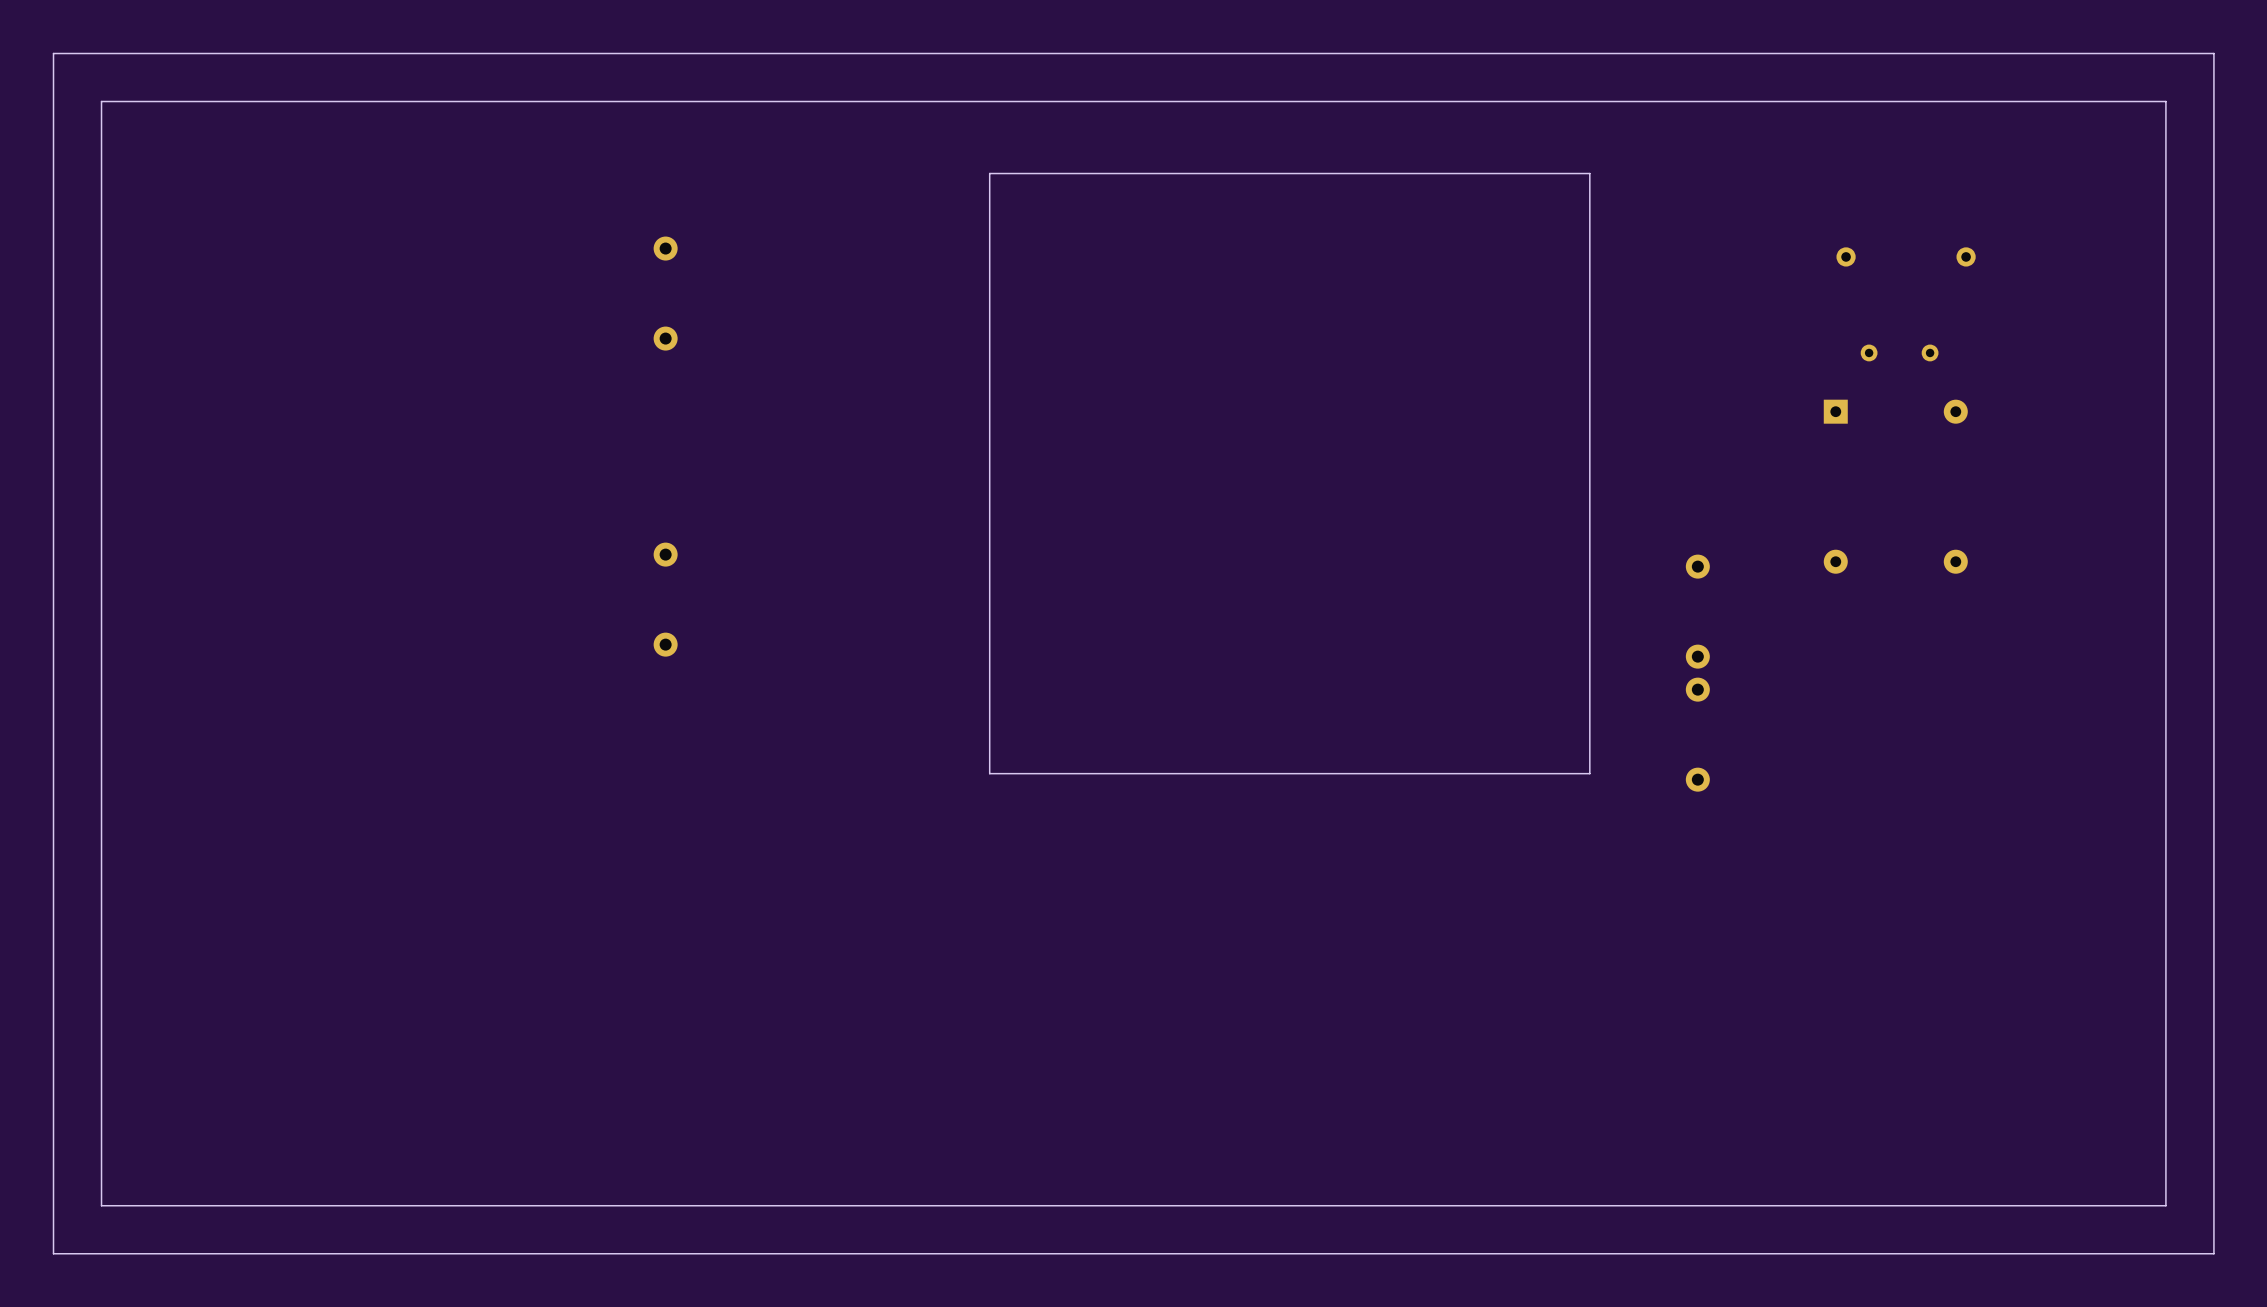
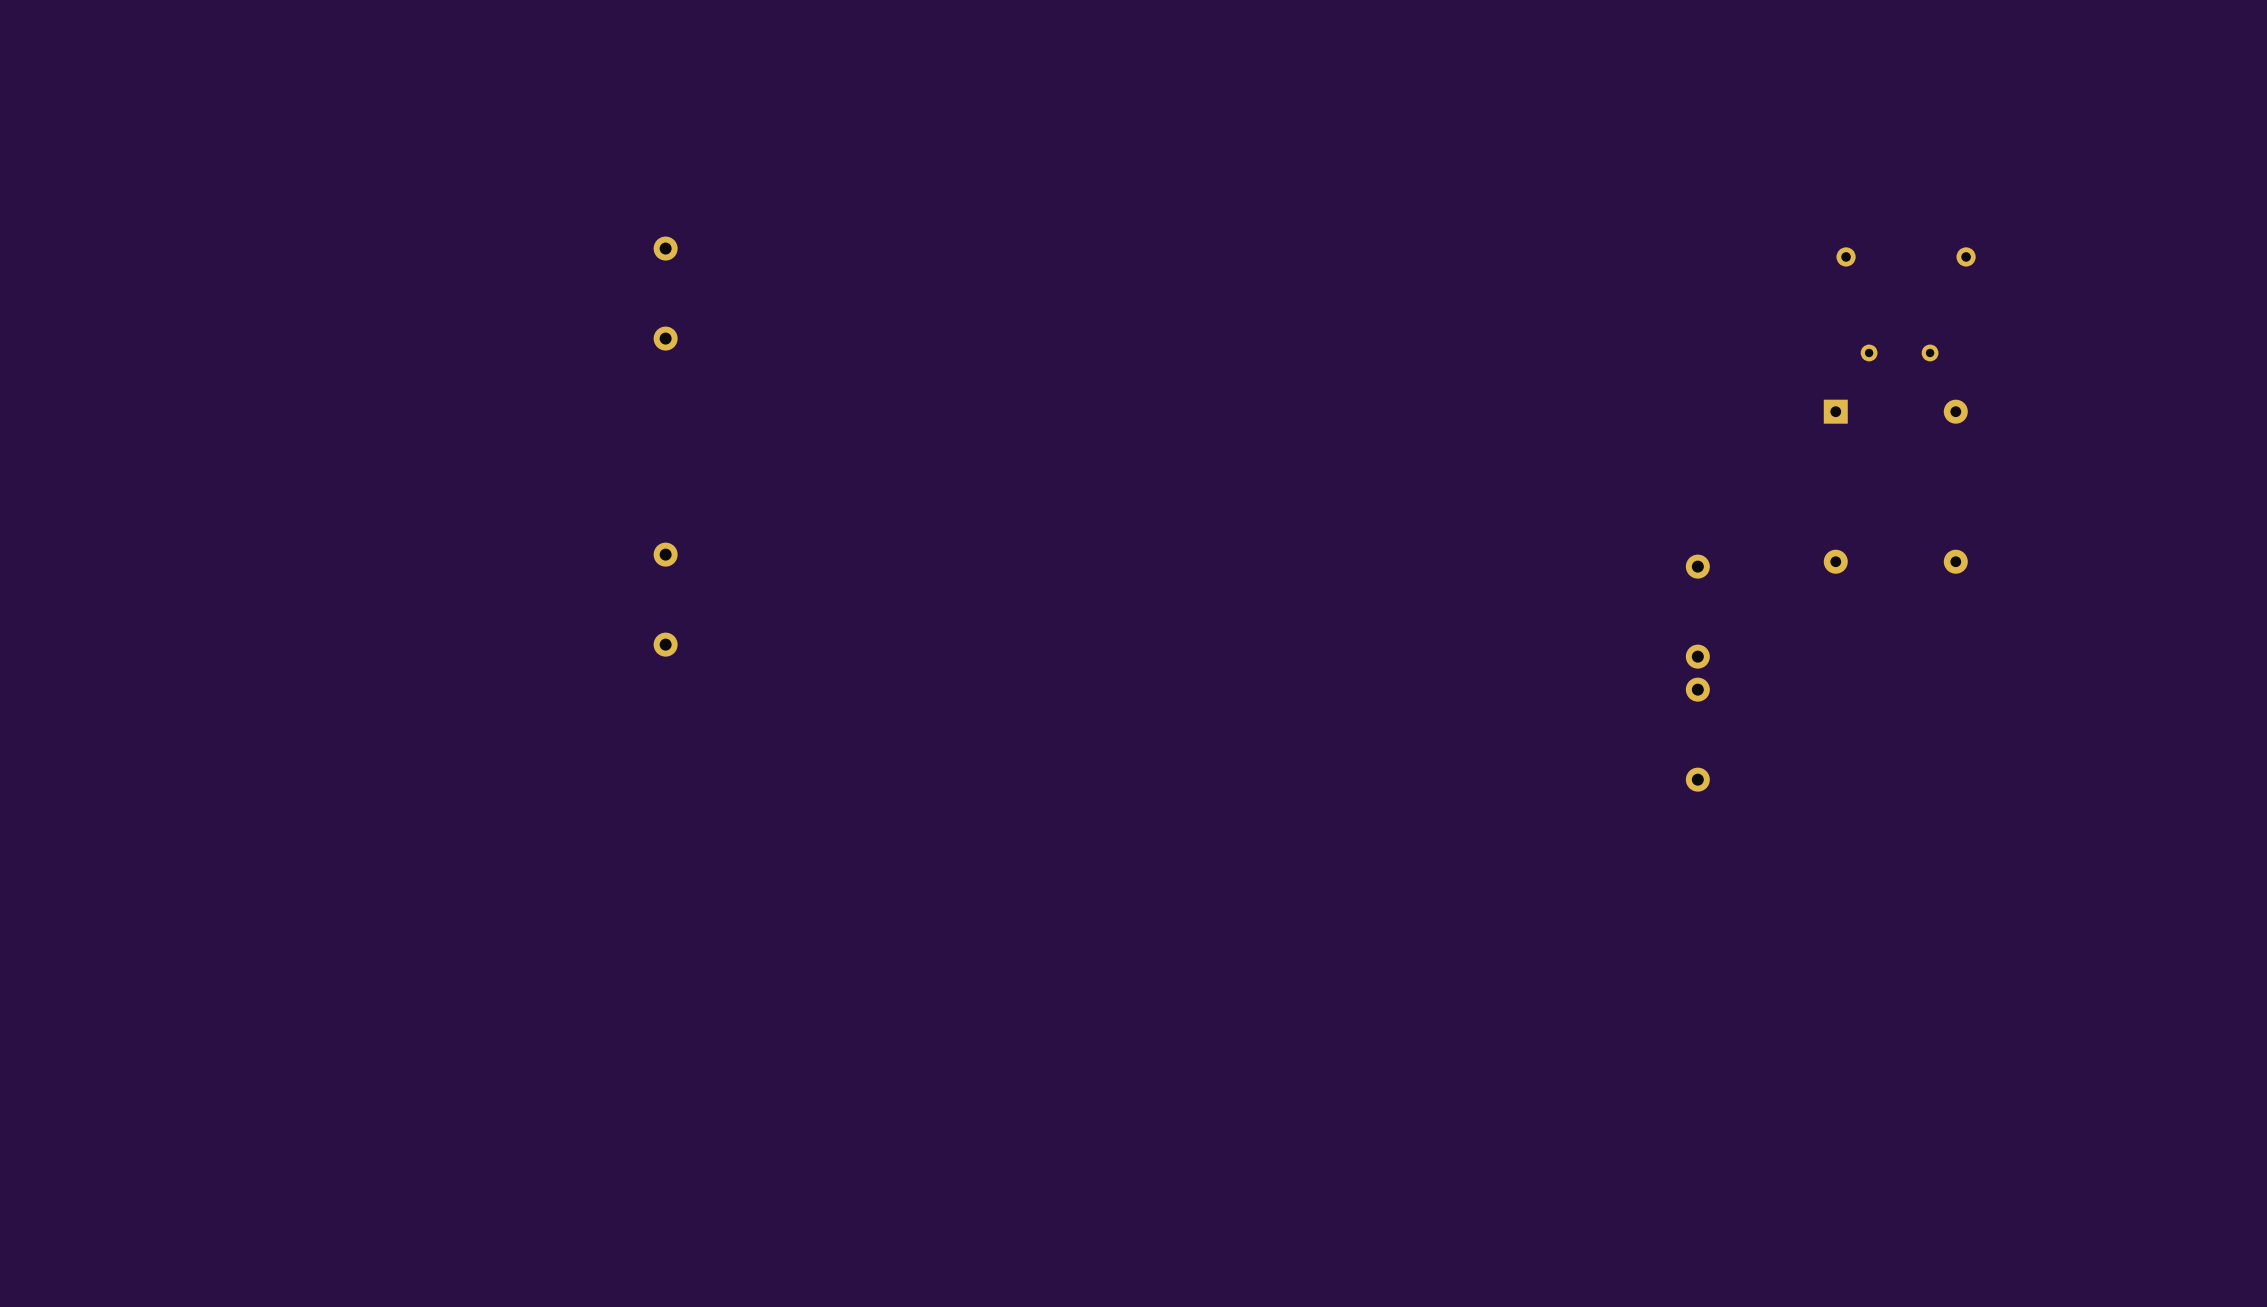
board edge: (2213, 53) (53, 53) (53, 1253) (2213, 1253) (2213, 53) -> none
board edge: (2165, 101) (101, 101) (101, 1205) (2165, 1205) (2165, 101) -> none
board edge: (1589, 173) (989, 173) (989, 773) (1589, 773) (1589, 173) -> none

